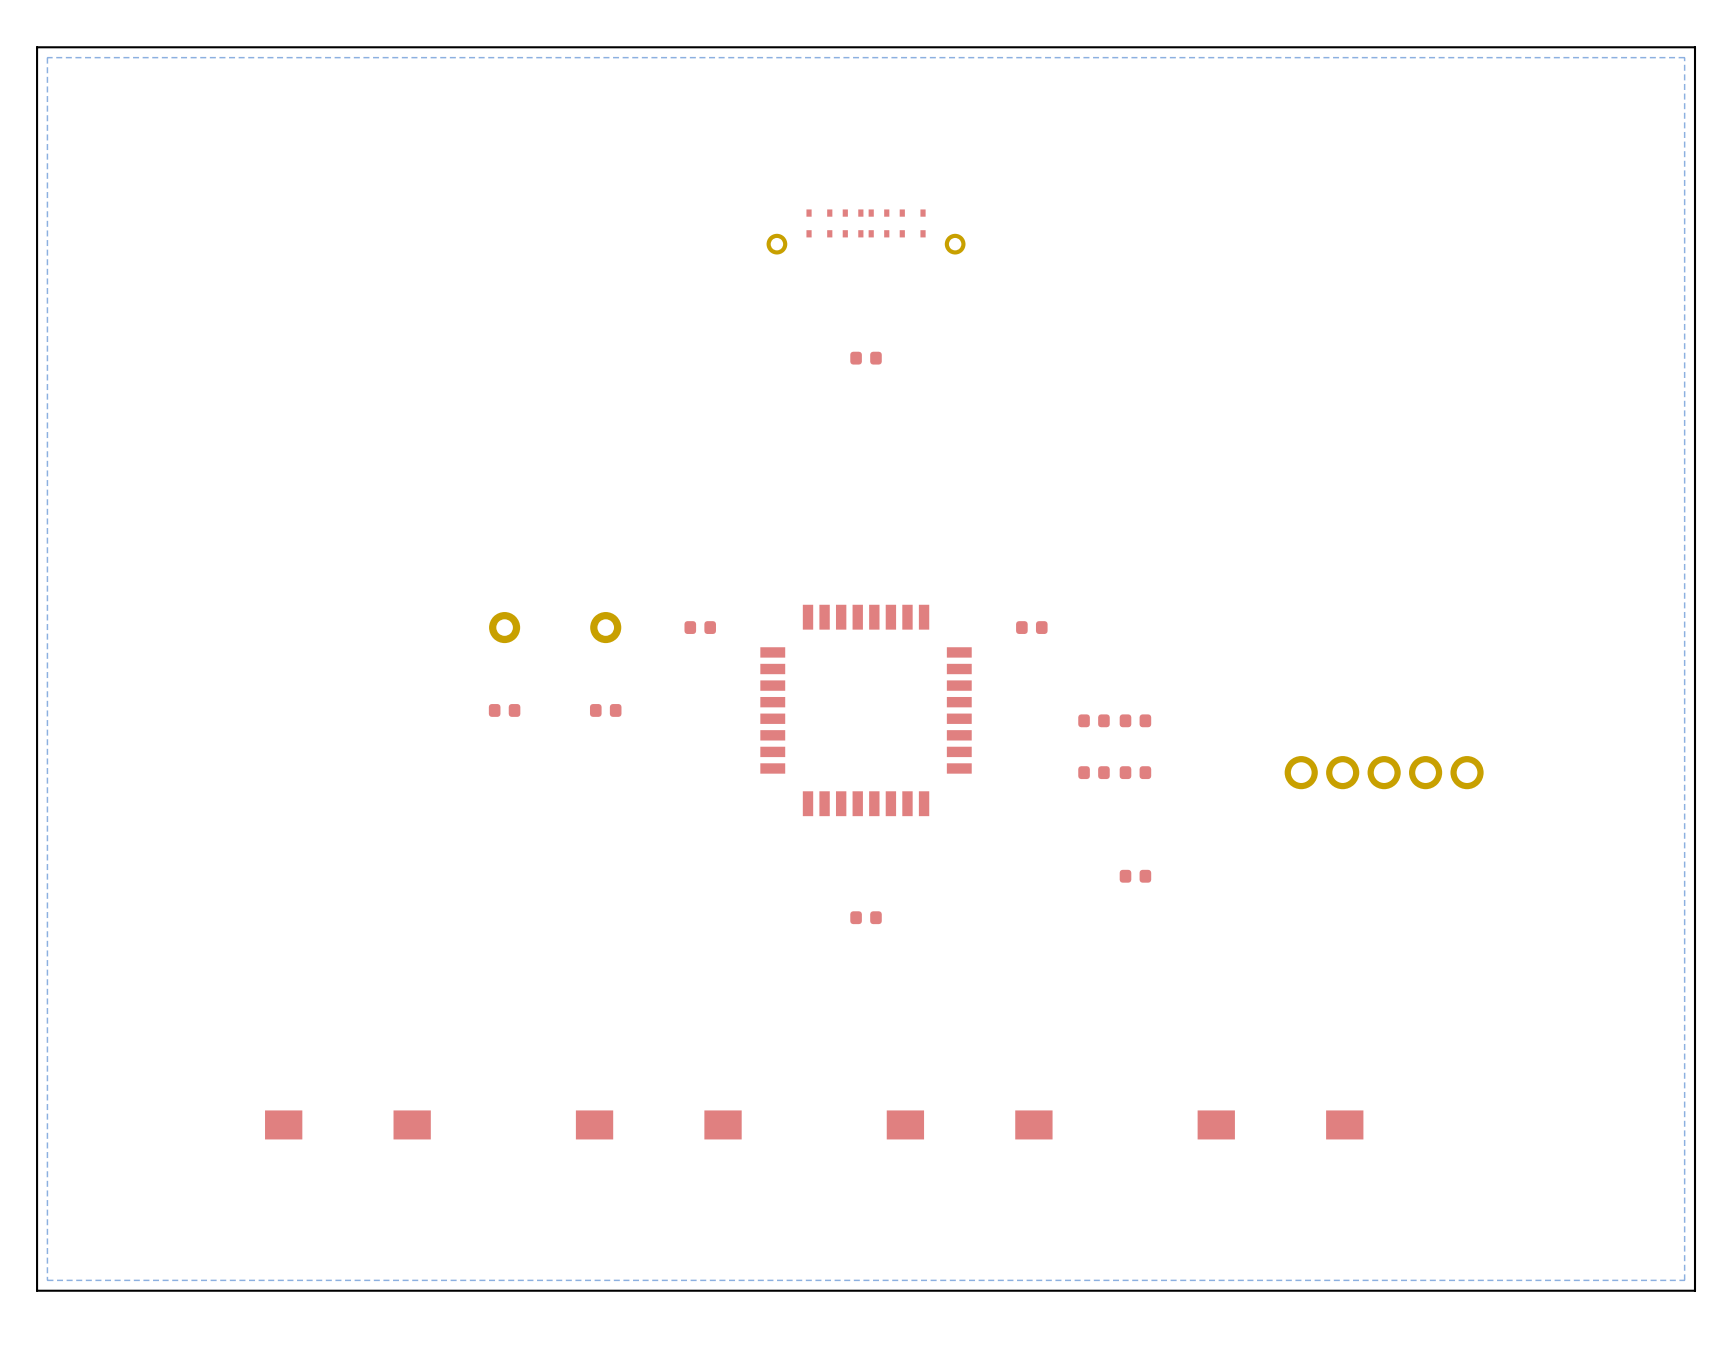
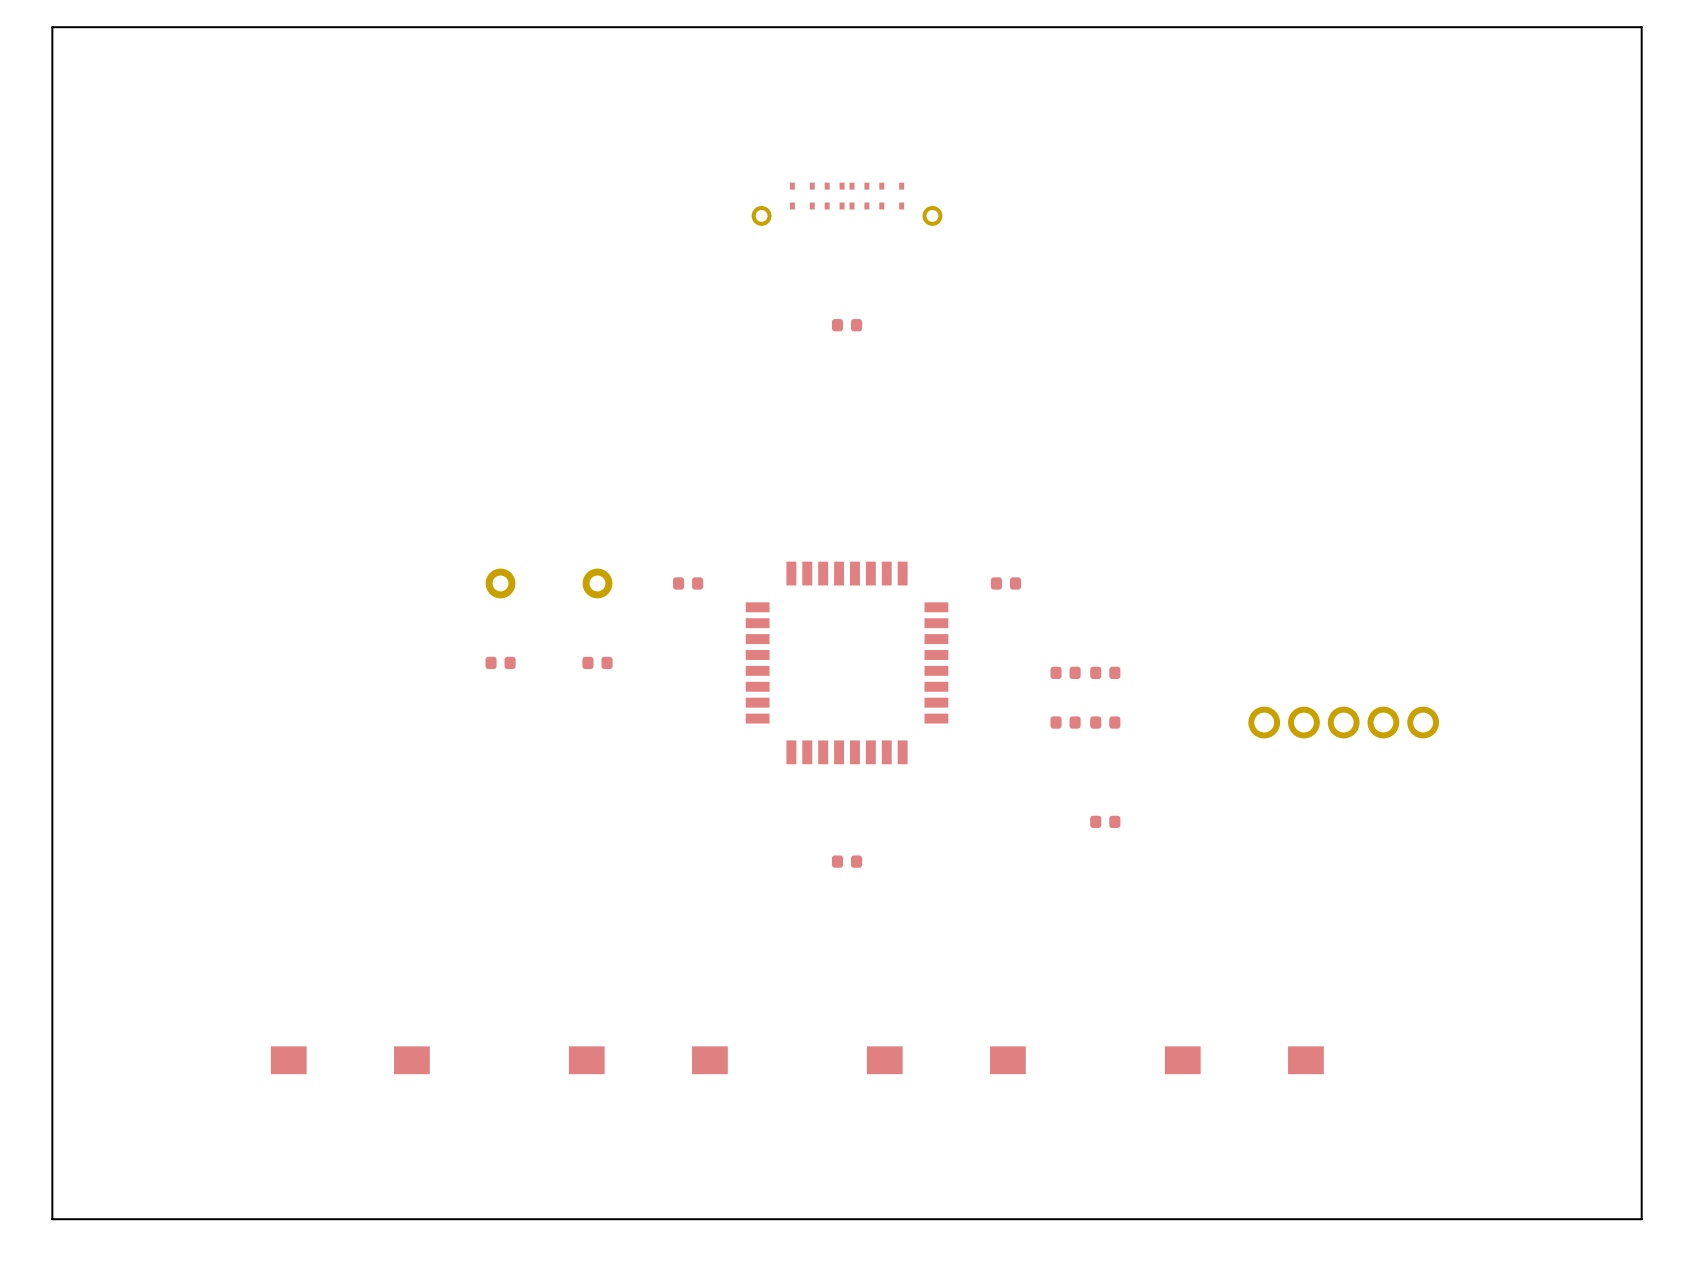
bottom zone outline: (1684, 57) (47, 57) (47, 1280) (1684, 1280) (1684, 57) -> none

